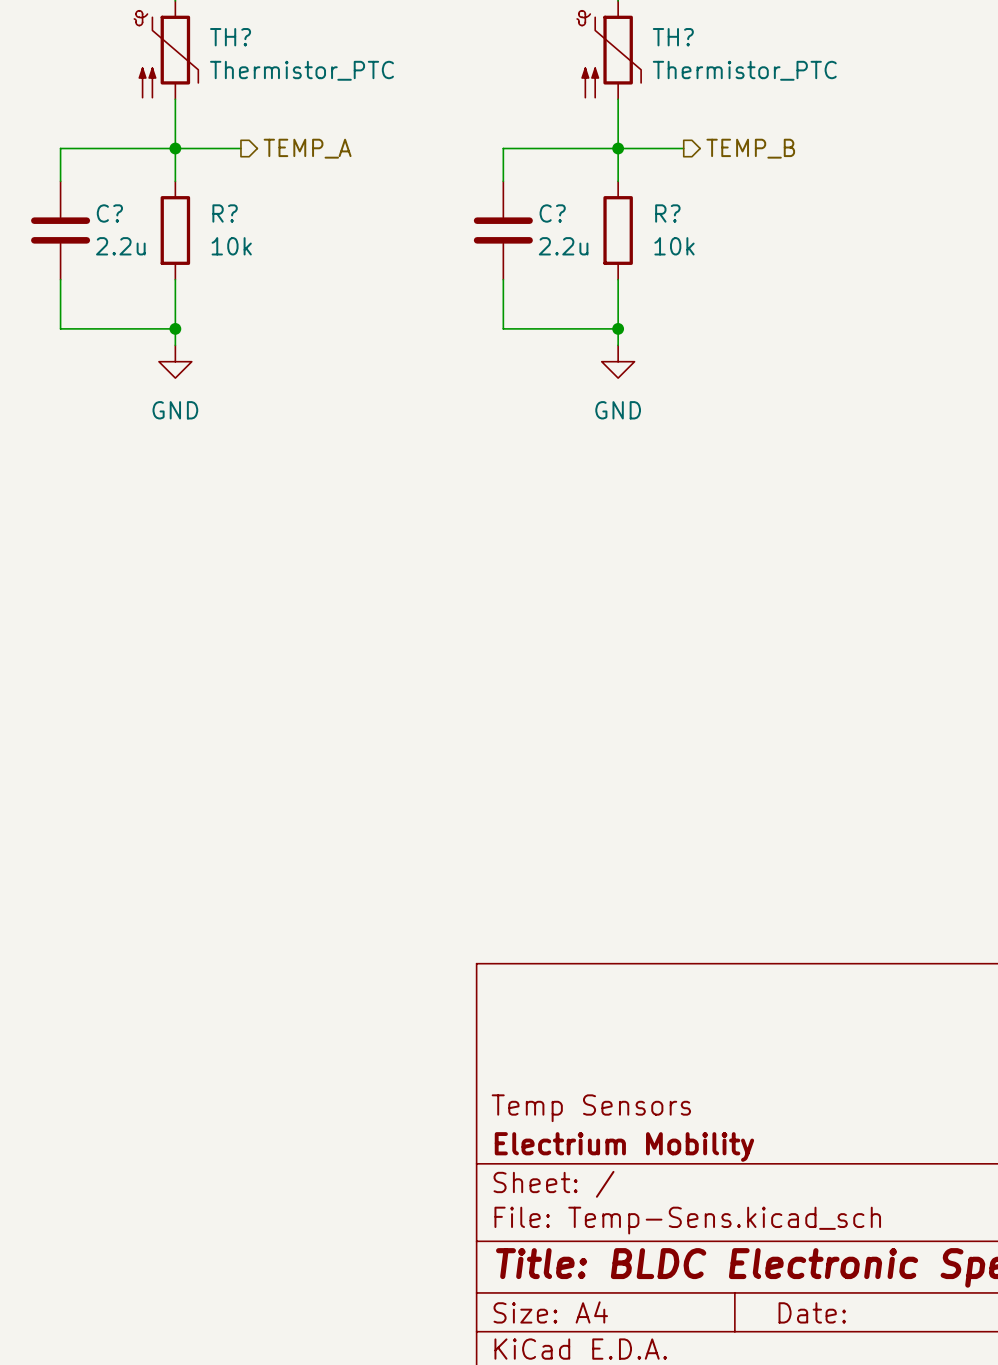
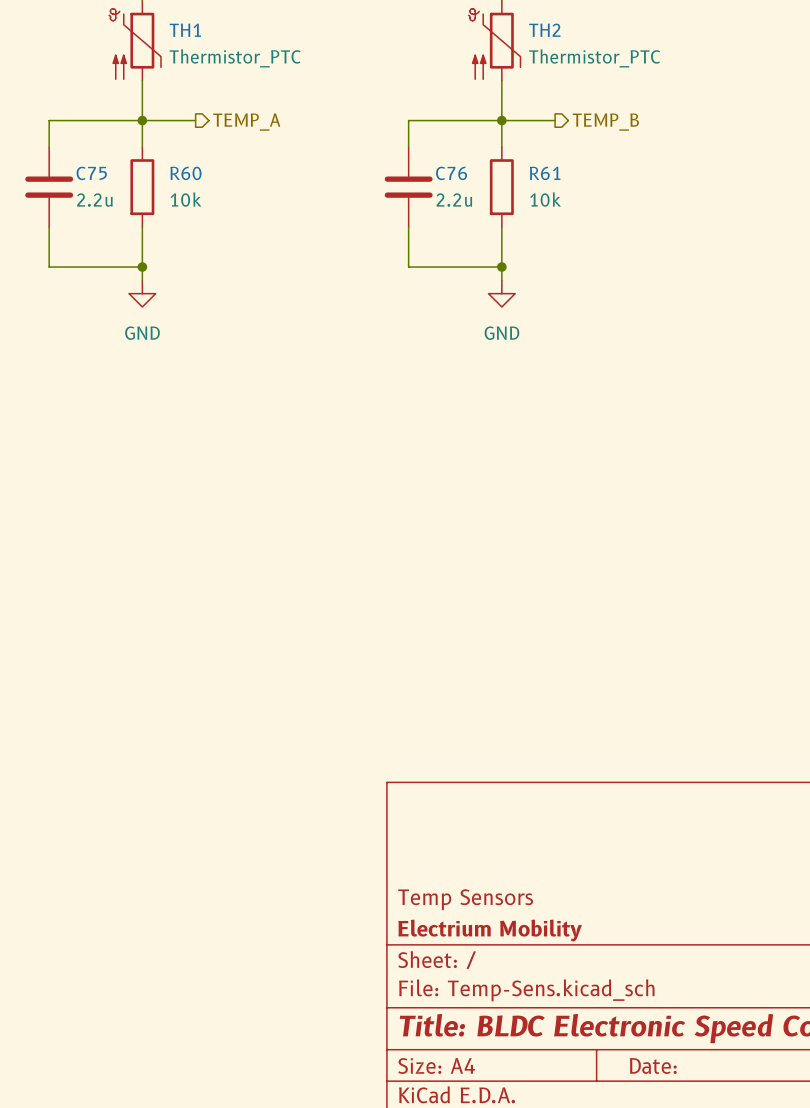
TH? name: TH? (230, 37) -> TH1 (185, 30)
TH? name: TH? (673, 37) -> TH2 (544, 30)
C? name: C? (109, 213) -> C75 (91, 173)
R? name: R? (225, 213) -> R60 (185, 173)
C? name: C? (552, 213) -> C76 (451, 173)
R? name: R? (667, 213) -> R61 (545, 173)

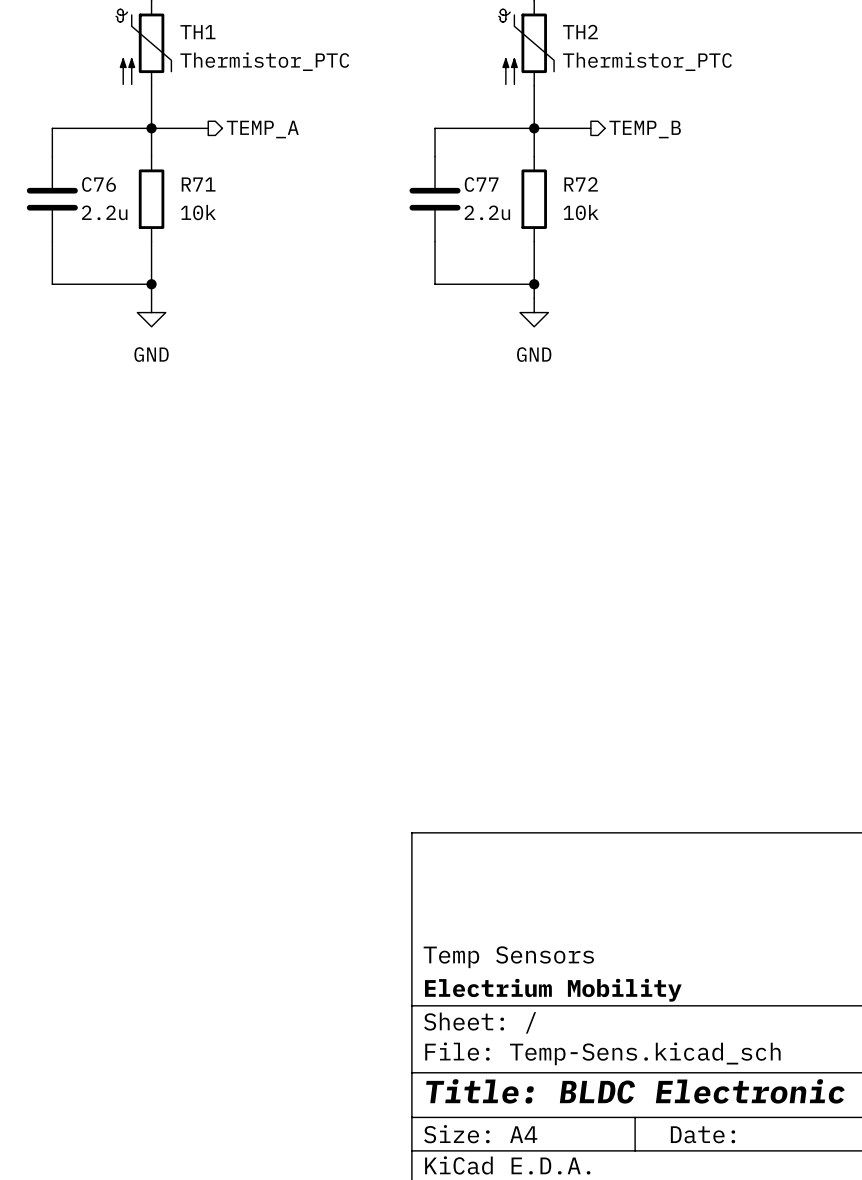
C75 name: C75 (91, 173) -> C76 (99, 184)
R60 name: R60 (185, 173) -> R71 (198, 184)
C76 name: C76 (451, 173) -> C77 (481, 184)
R61 name: R61 (545, 173) -> R72 (581, 184)

